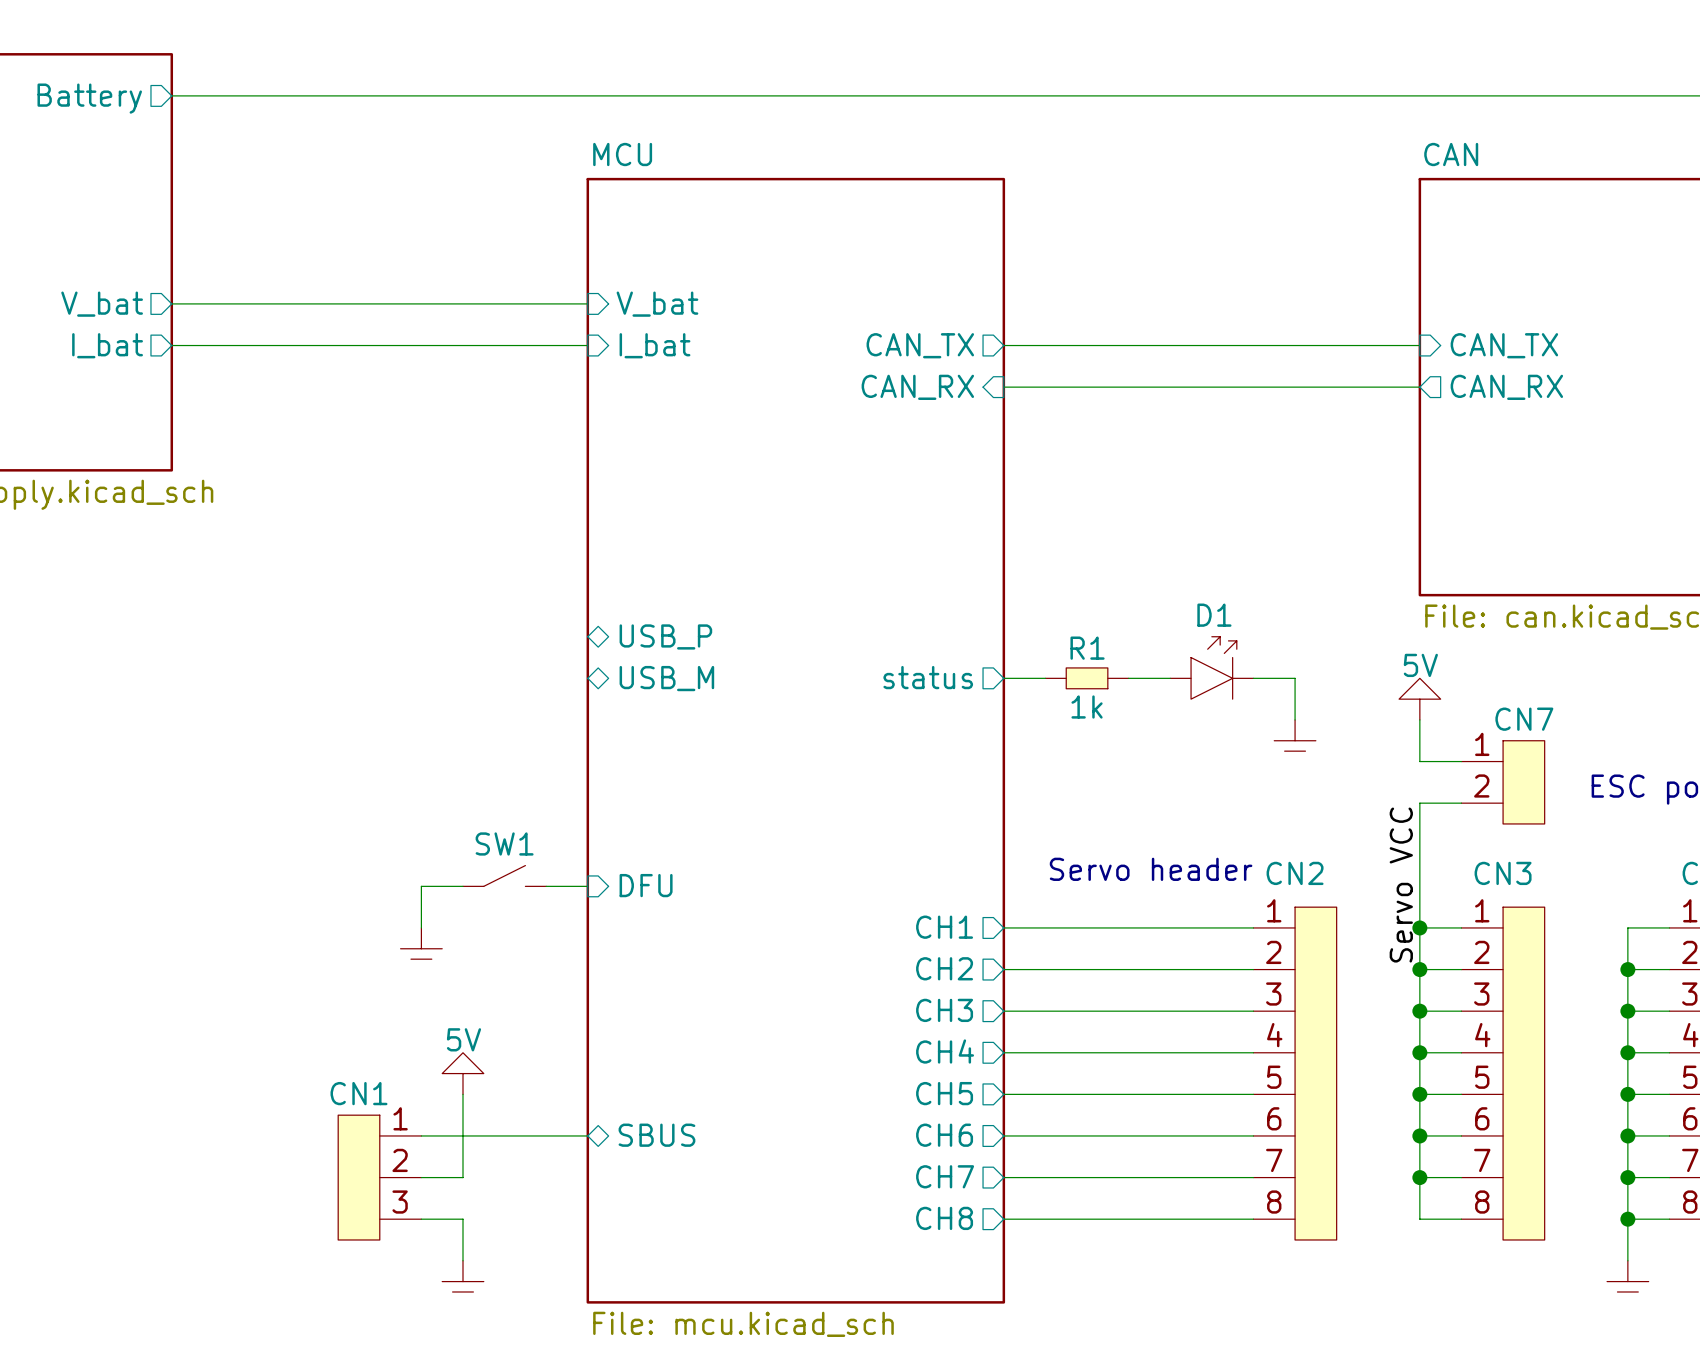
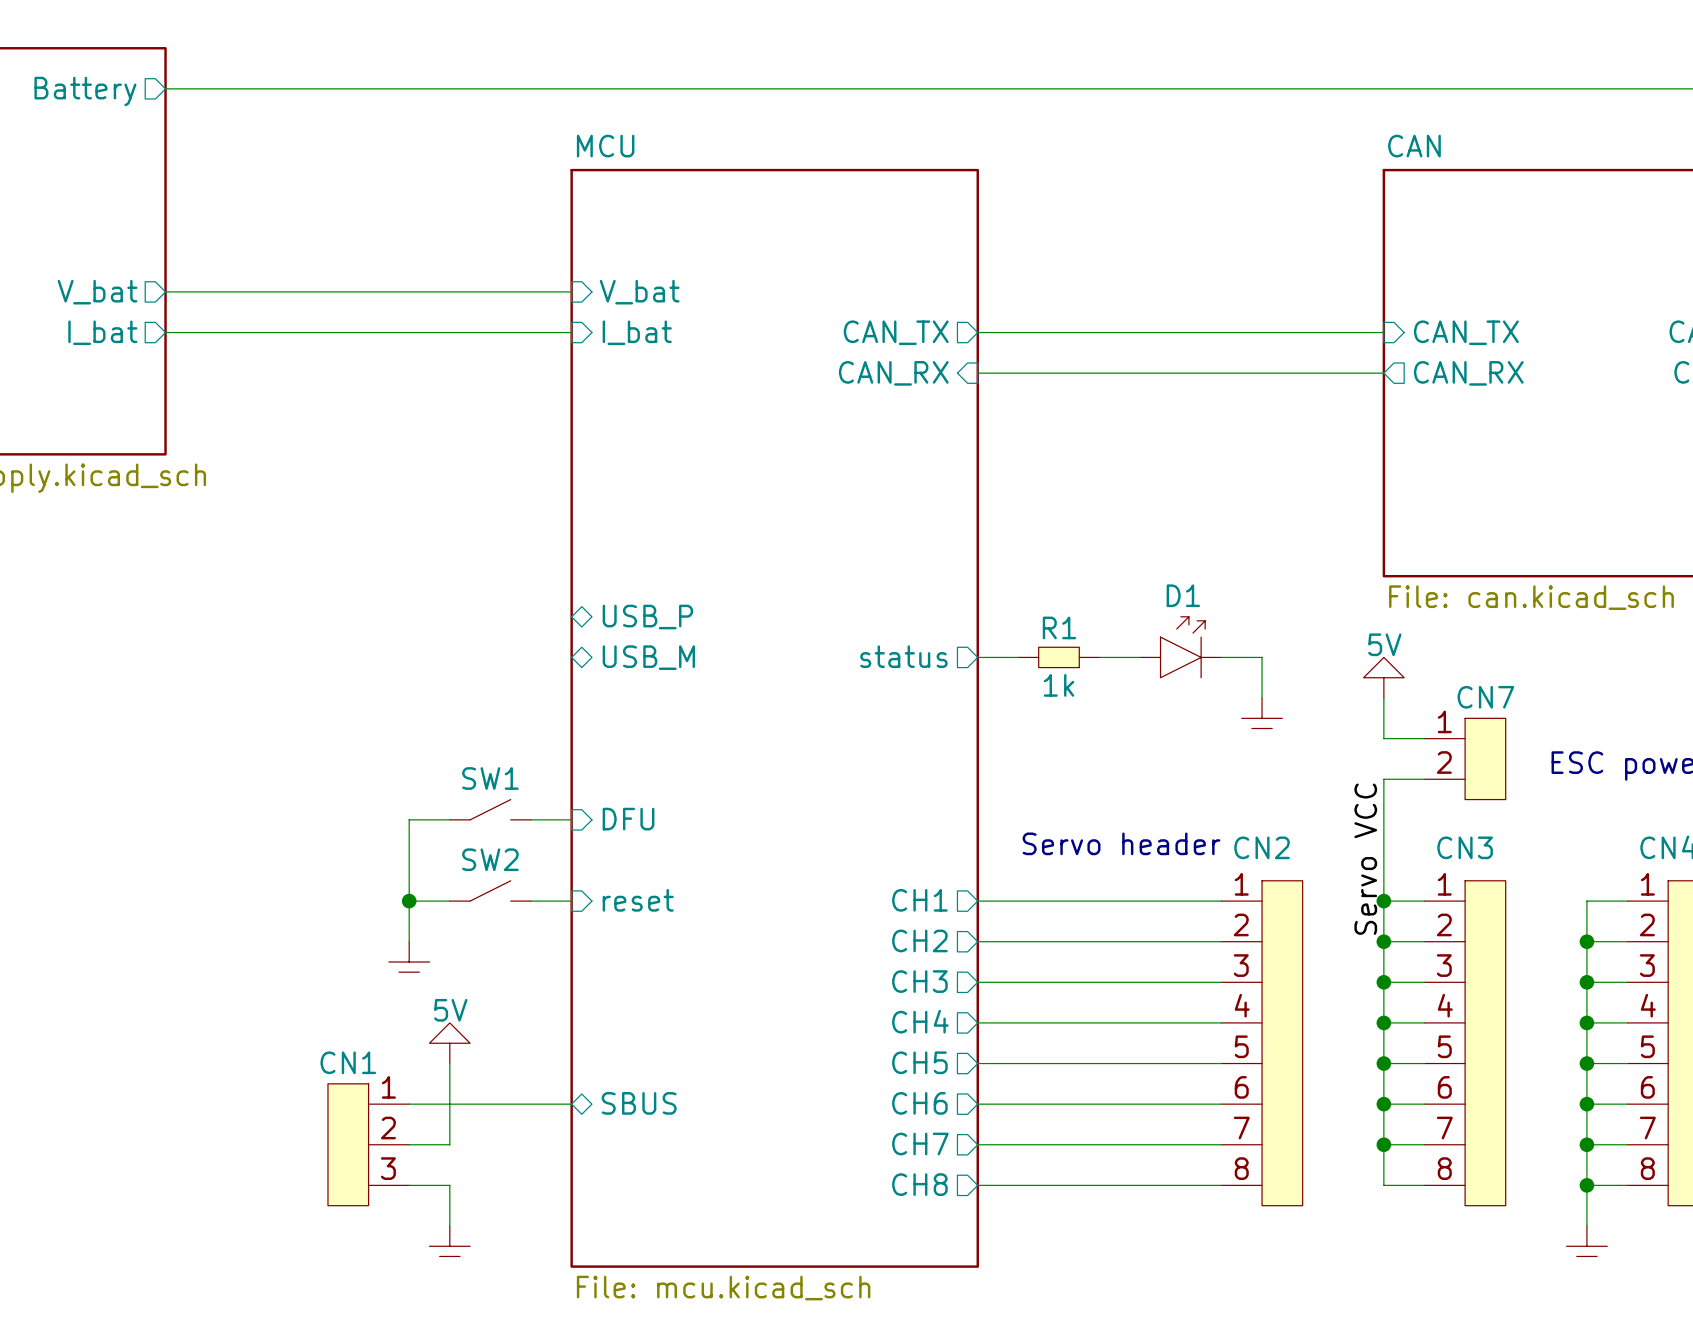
SW1 position: (504, 875) -> (490, 809)
sheet pin position: DFU (646, 885) -> DFU (628, 819)
wire: (421, 886) (462, 886) -> (409, 860) (409, 819) (449, 819)
wire: (546, 886) (587, 886) -> (531, 819) (571, 819)
SW2: none -> (490, 890)
junction: none -> (409, 901)
wire: none -> (449, 901) (409, 901) (409, 941)
wire: none -> (531, 901) (571, 901)
sheet pin: none -> reset (638, 900)
power symbol position: (421, 948) -> (409, 962)

